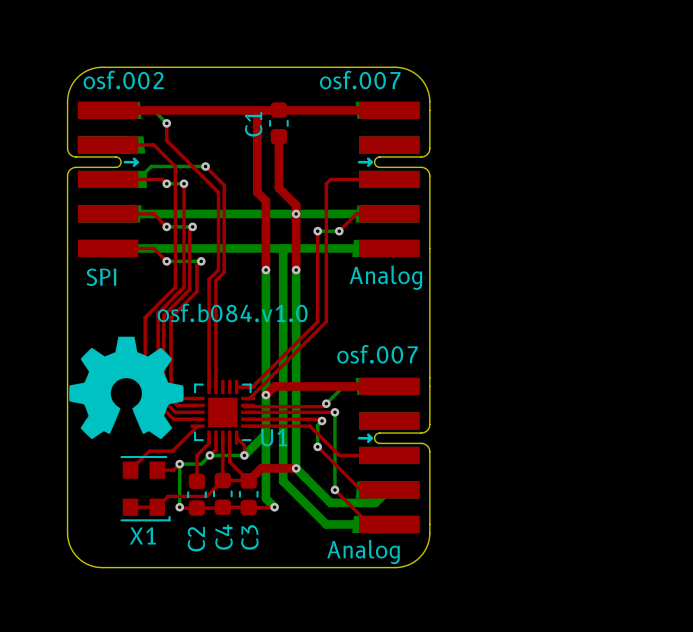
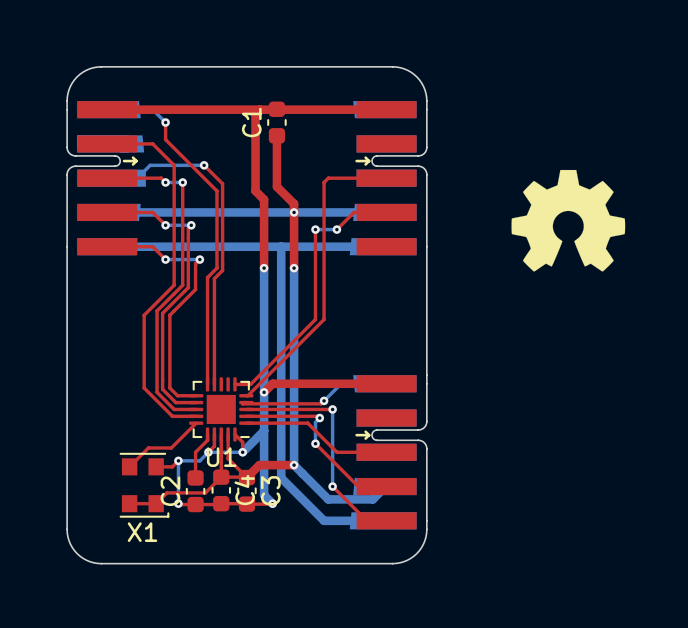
text: osf.002 (123, 80) -> none
text: osf.007 (360, 80) -> none
drawing: none -> [511, 169, 626, 272]
text: SPI (101, 277) -> none
text: Analog (385, 277) -> none
text: osf.b084.v1.0 (232, 312) -> none
drawing: [69, 336, 184, 440] -> none
text: osf.007 (377, 354) -> none
U1 name position: U1 (274, 437) -> U1 (221, 457)
C4 name position: C4 (224, 537) -> C4 (244, 489)
C3 name position: C3 (249, 537) -> C3 (270, 490)
C2 name position: C2 (196, 539) -> C2 (170, 491)
text: Analog (363, 552) -> none

